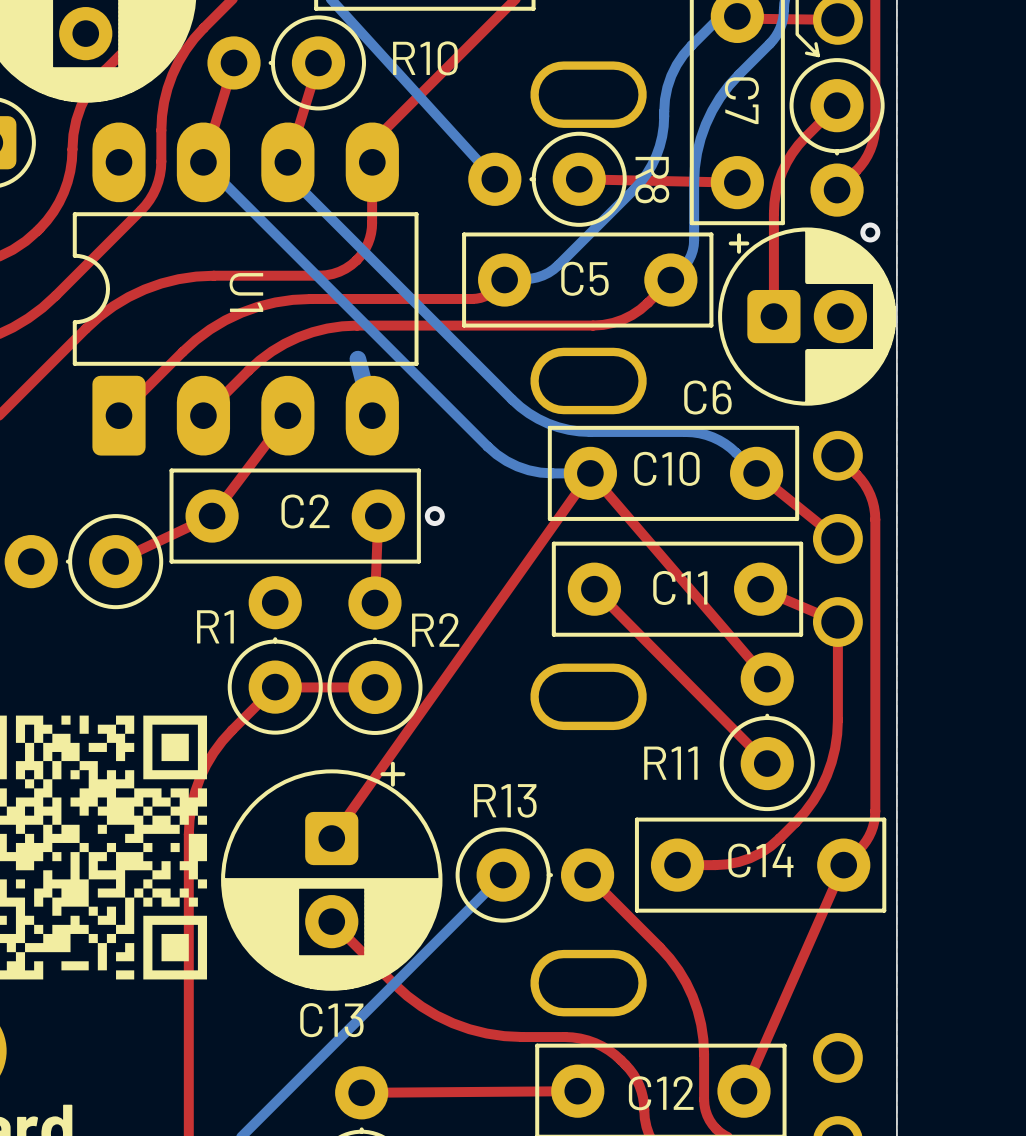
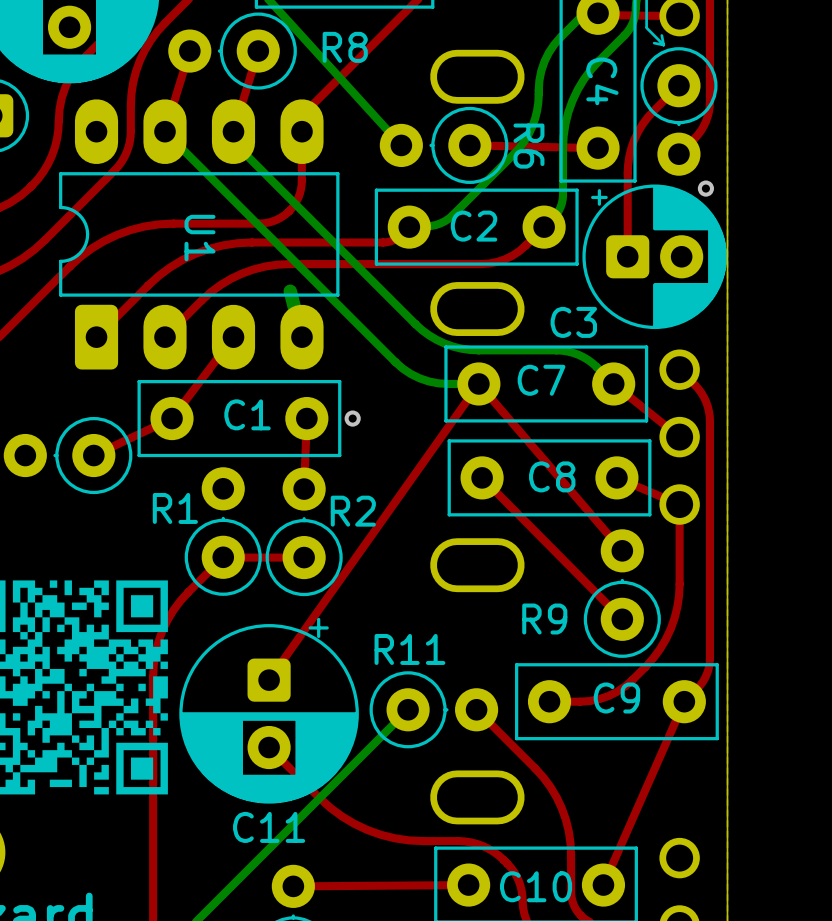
R10 name: R10 (425, 58) -> R8 (345, 47)
C7 name: C7 (741, 100) -> C4 (602, 81)
R8 name: R8 (652, 180) -> R6 (528, 146)
C5 name: C5 (584, 278) -> C2 (474, 226)
C6 name: C6 (707, 397) -> C3 (573, 322)
C10 name: C10 (666, 468) -> C7 (541, 380)
C2 name: C2 (305, 511) -> C1 (247, 414)
C11 name: C11 (680, 587) -> C8 (552, 476)
R11 name: R11 (670, 763) -> R9 (544, 619)
R13 name: R13 (505, 800) -> R11 (409, 649)
C14 name: C14 (760, 860) -> C9 (616, 697)
C13 name: C13 (331, 1020) -> C11 (269, 827)
C12 name: C12 (661, 1093) -> C10 (536, 886)

